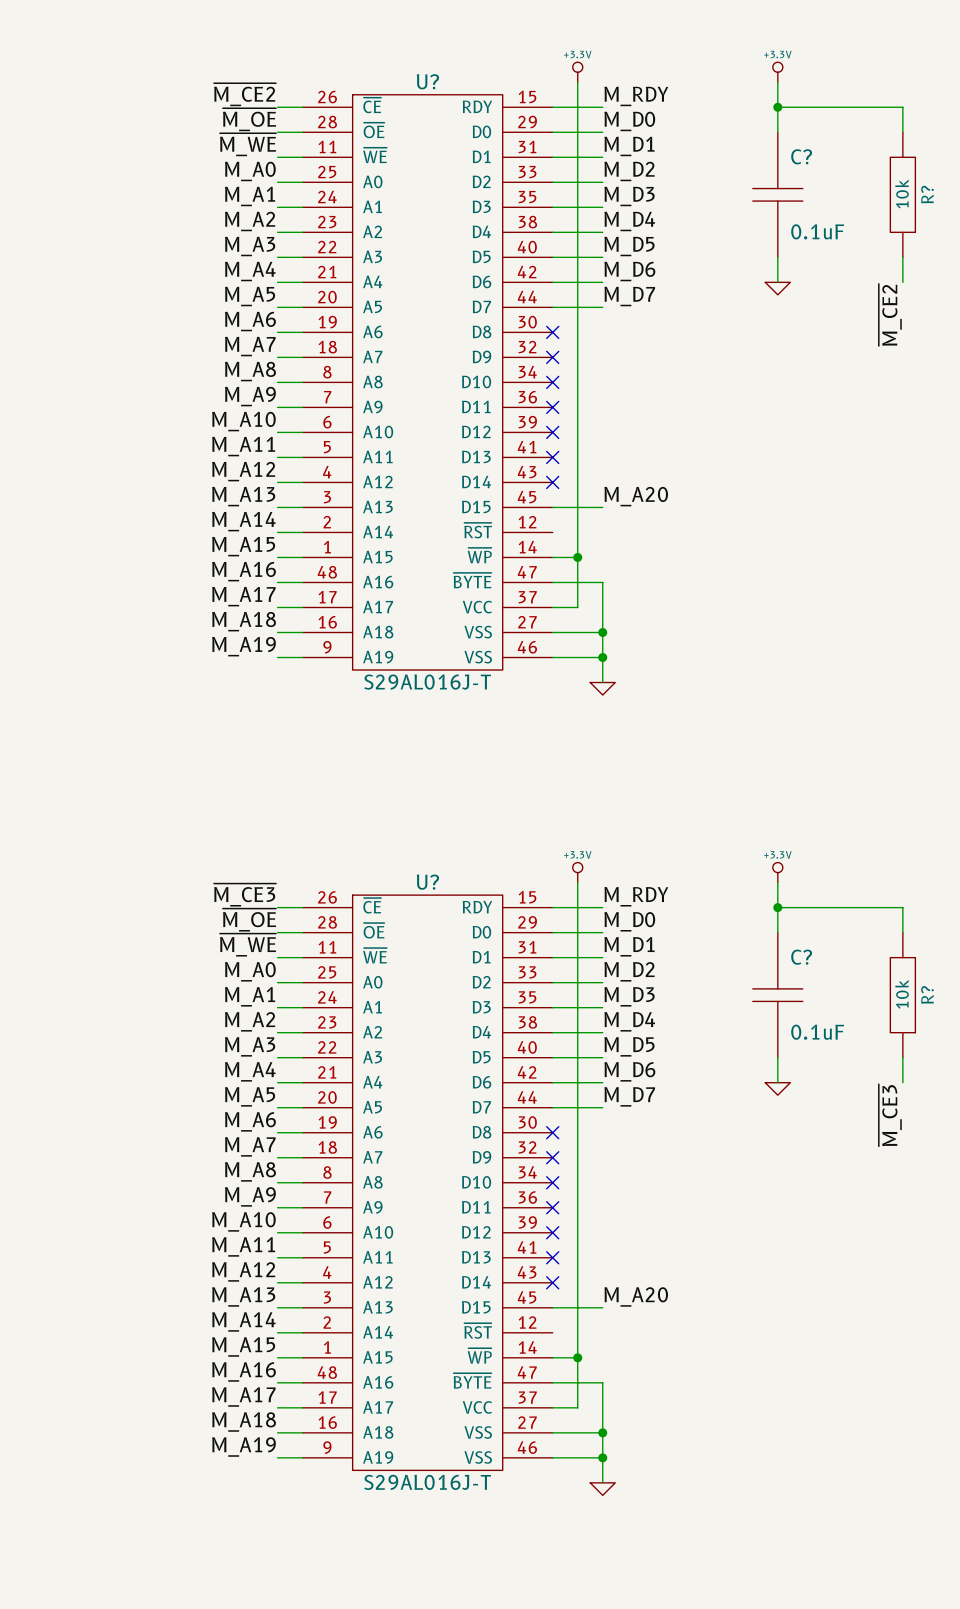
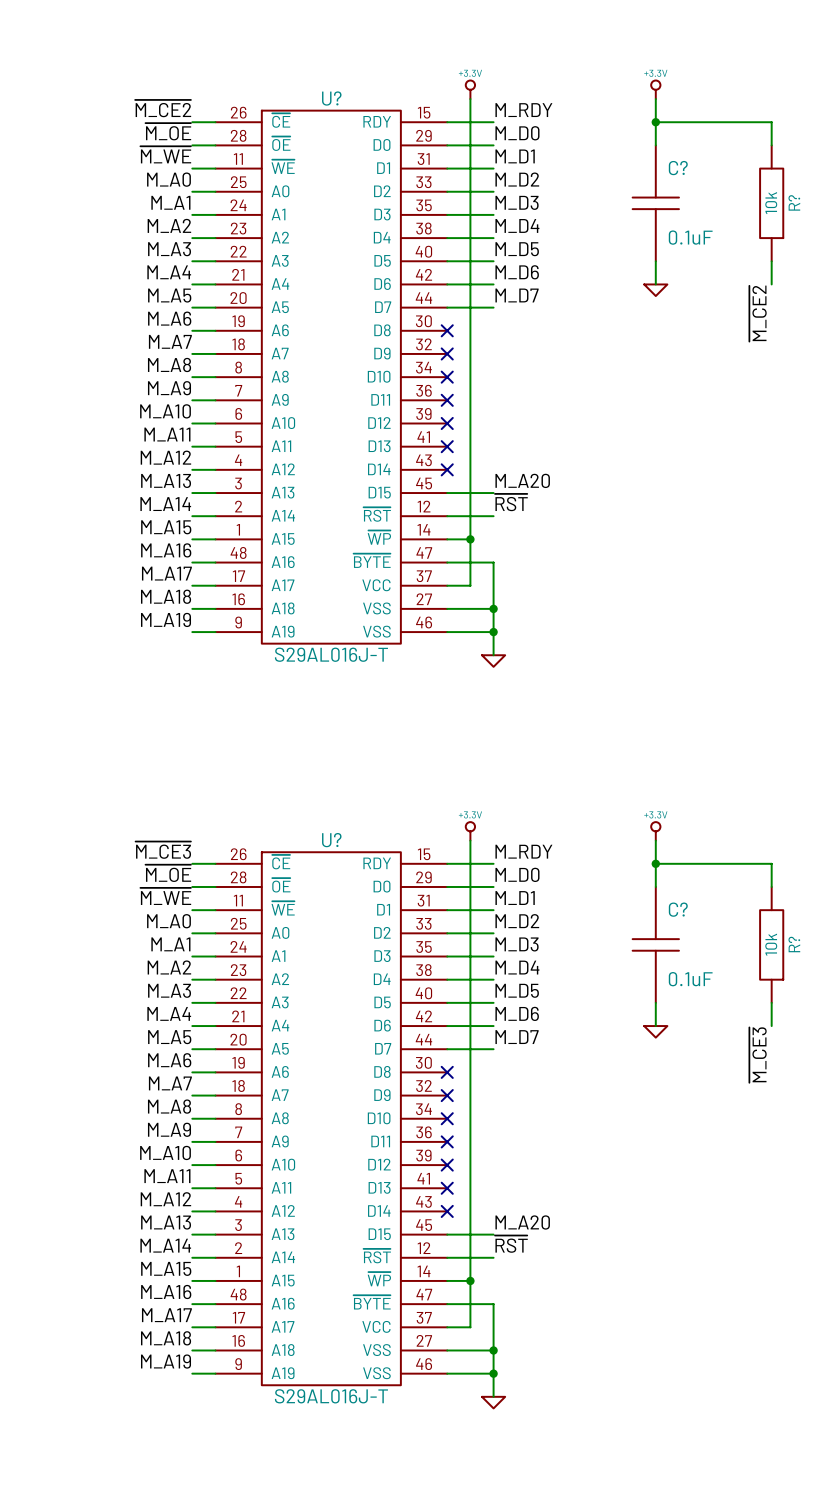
label: none -> ~{RST} (511, 502)
wire: none -> (447, 516) (493, 516)
label: none -> ~{RST} (511, 1244)
wire: none -> (447, 1257) (493, 1257)

